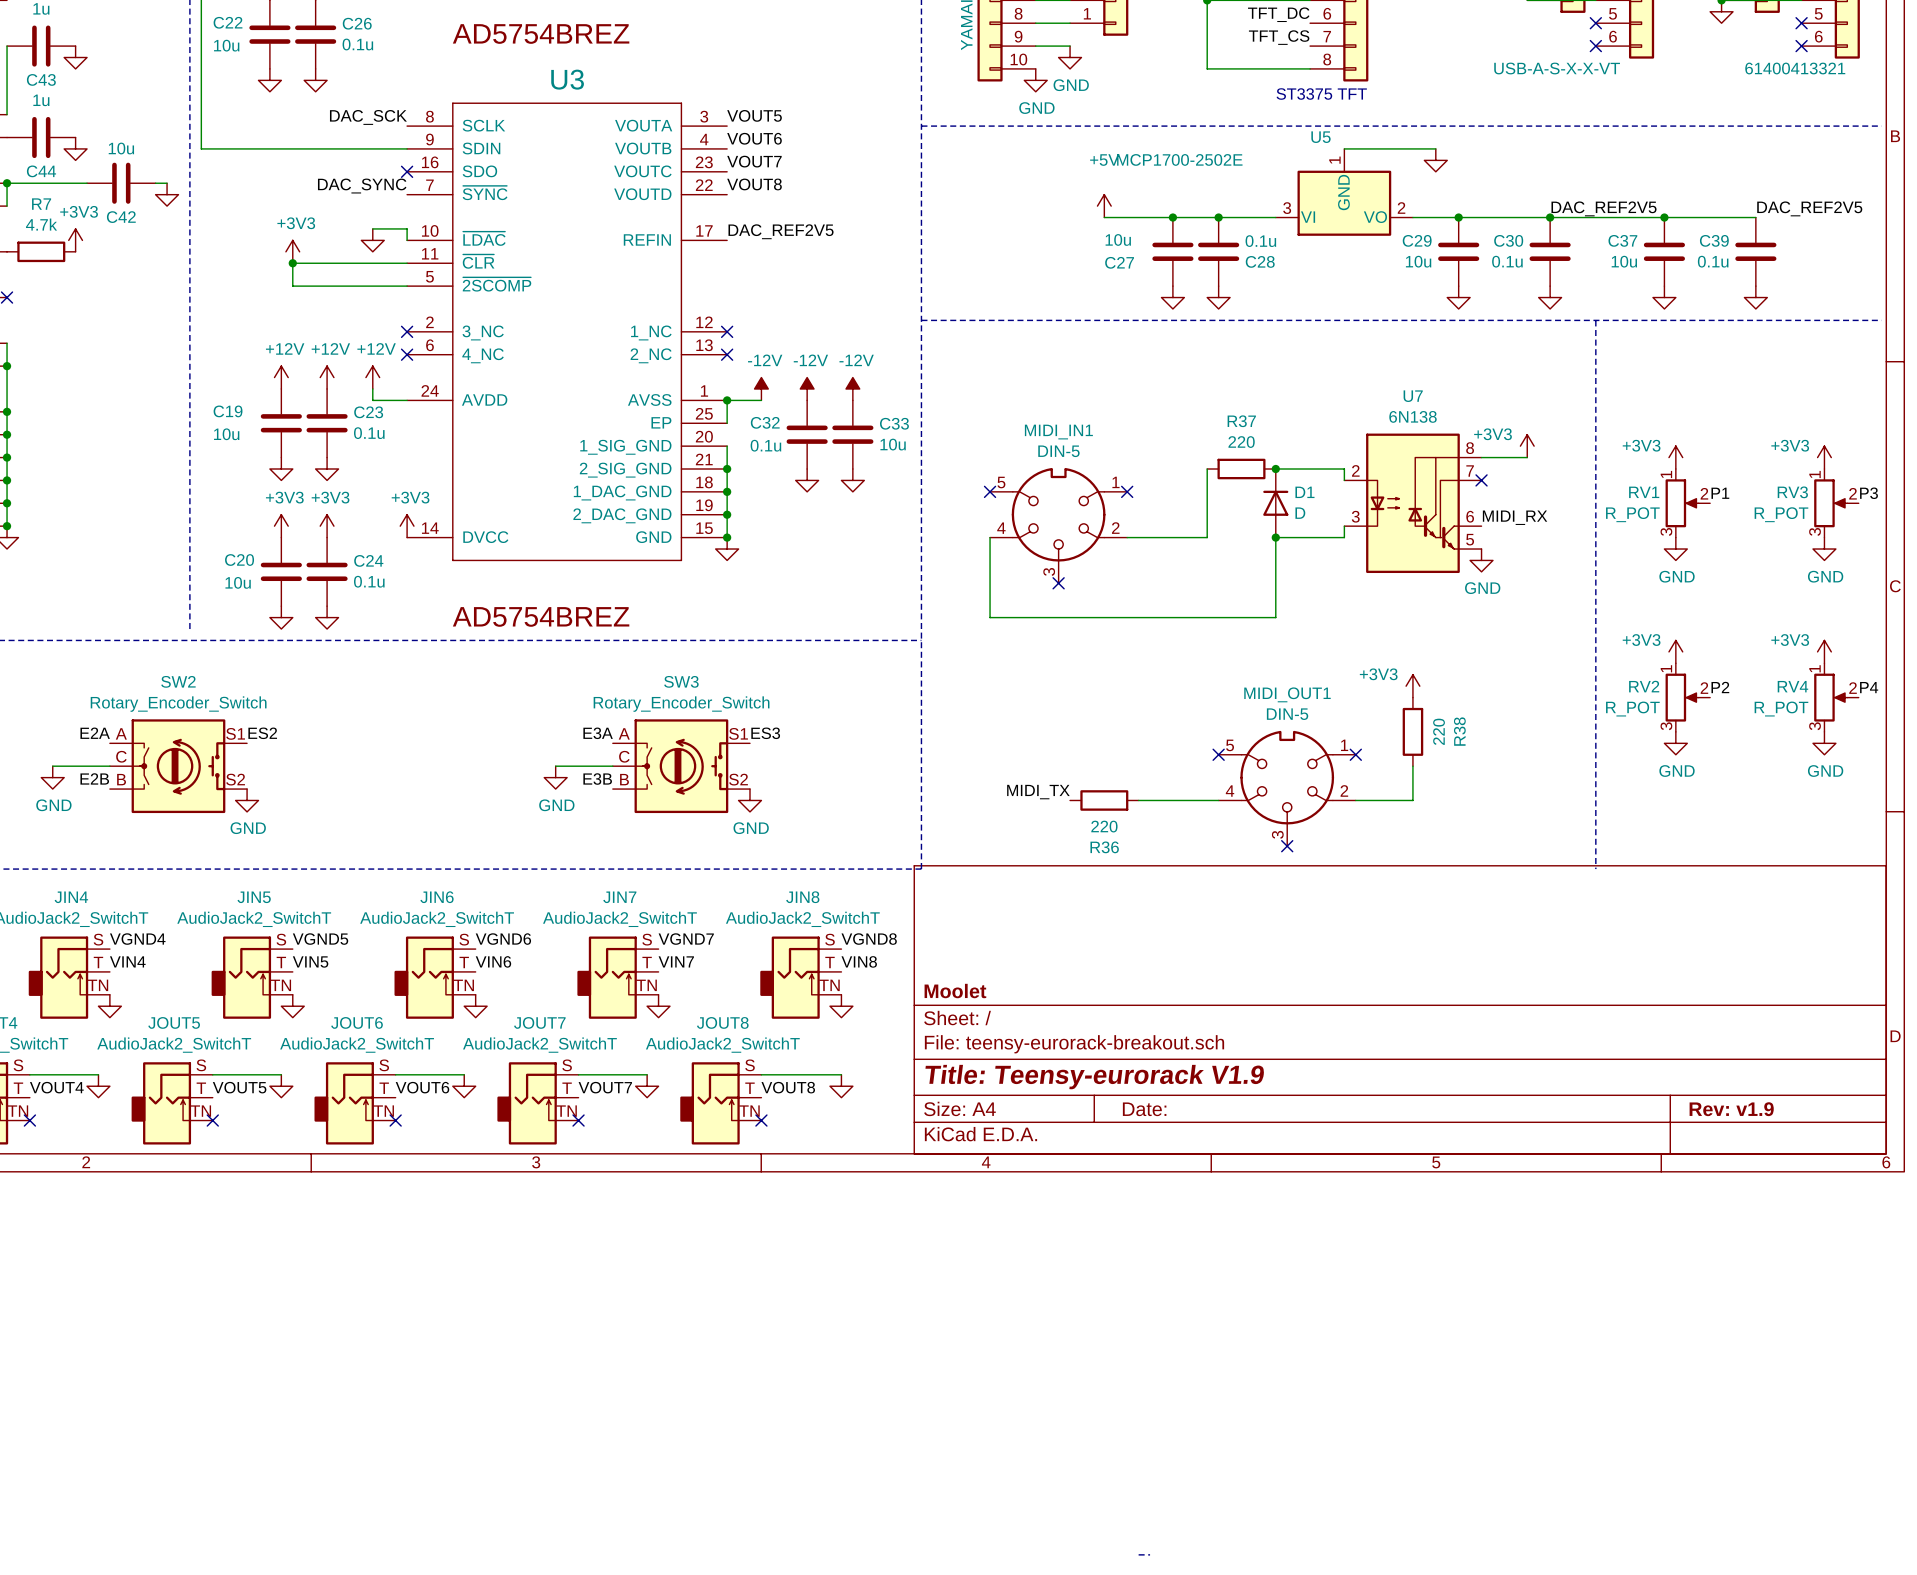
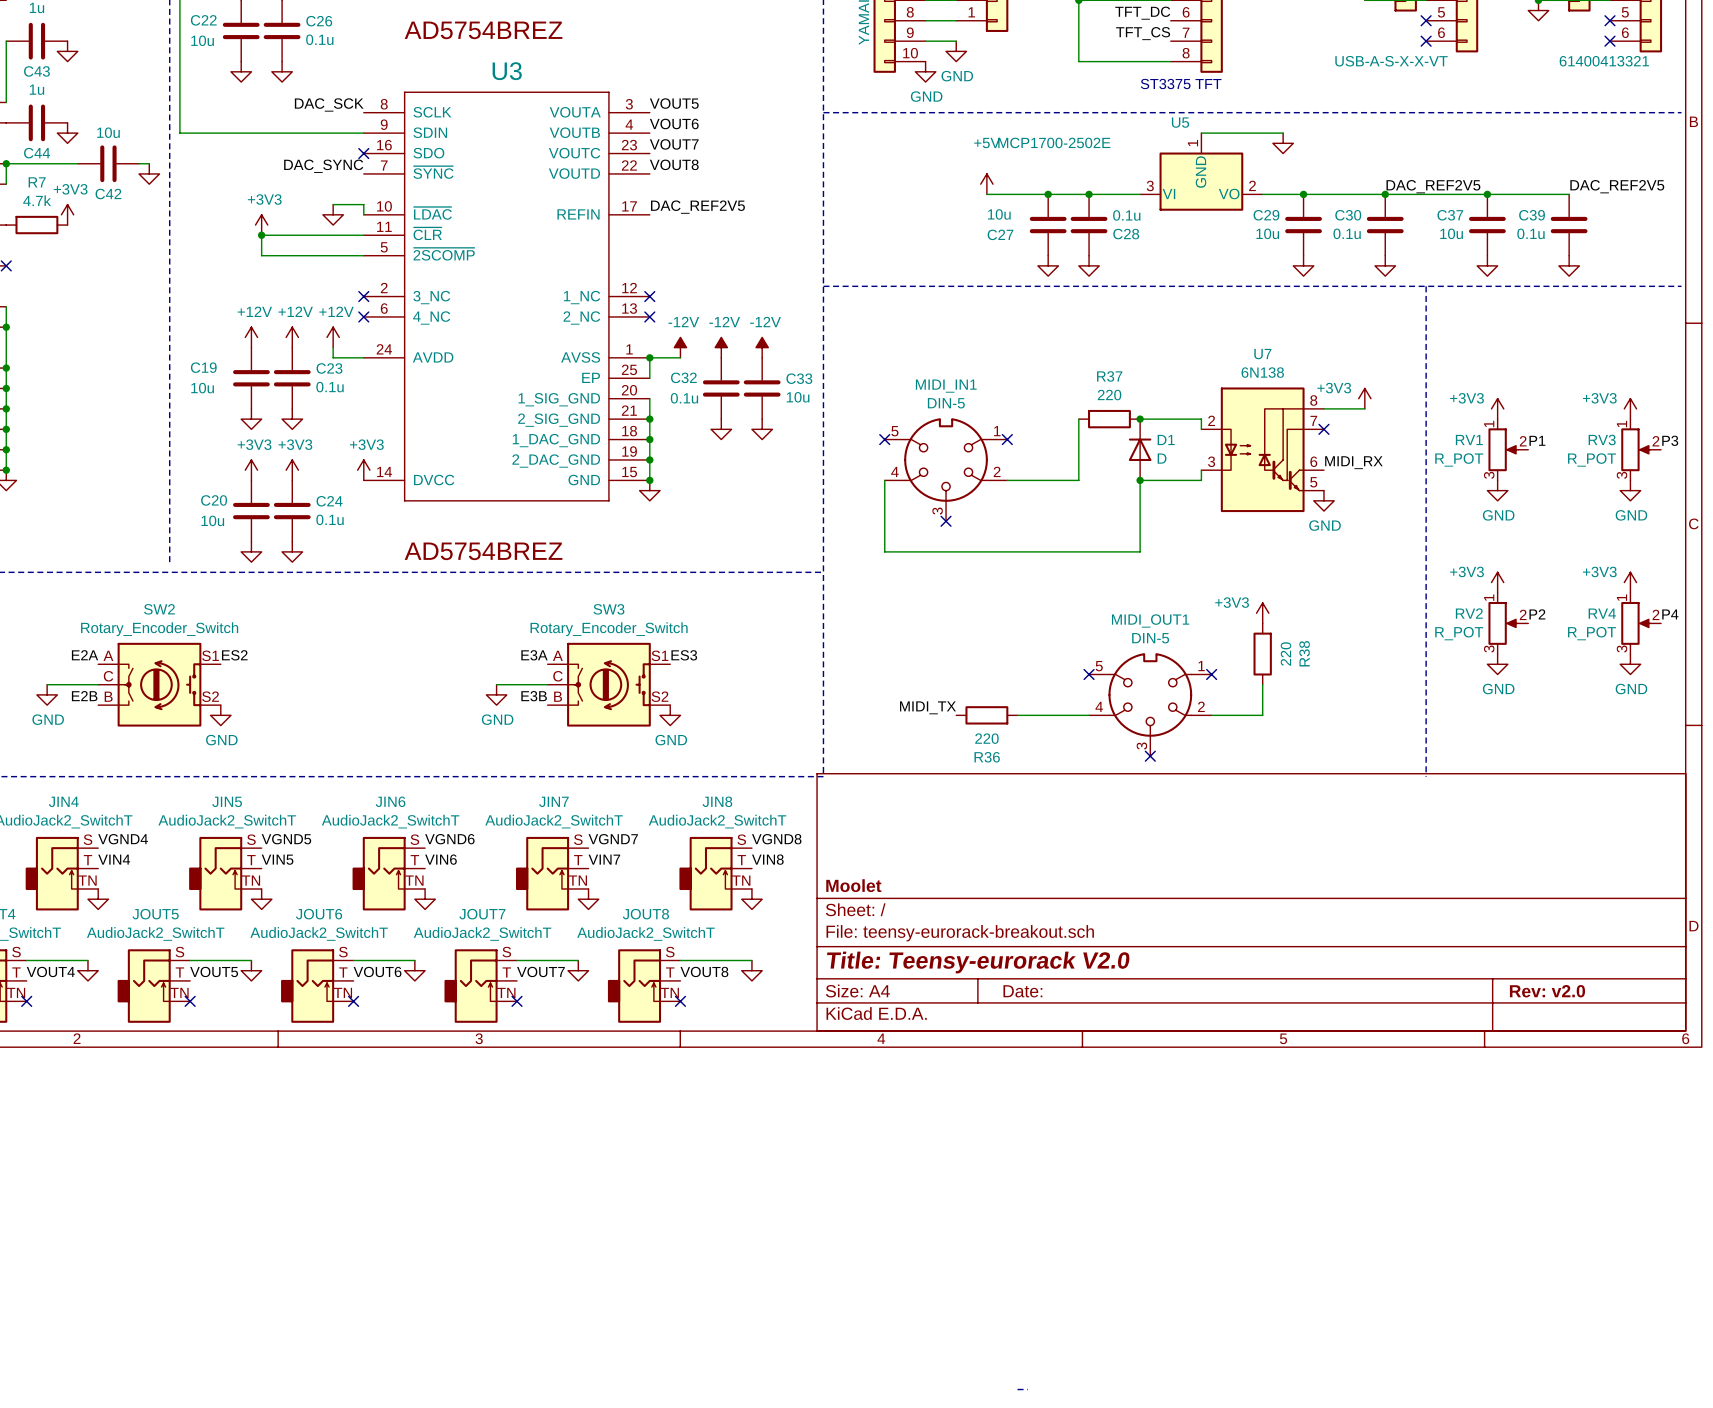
title block: Title: Teensy-eurorack V1.9 (1094, 1077) -> Title: Teensy-eurorack V2.0 (978, 962)
title block: Rev: v1.9 (1731, 1109) -> Rev: v2.0 (1547, 991)

